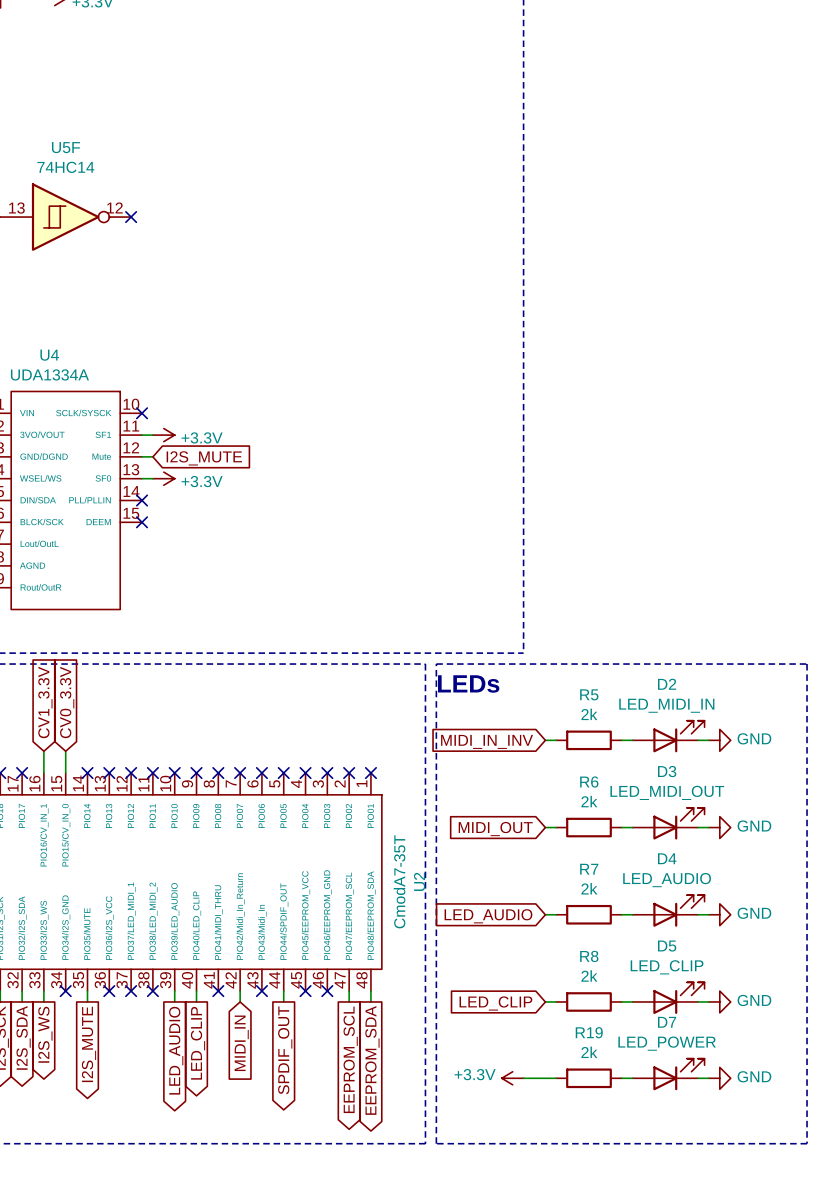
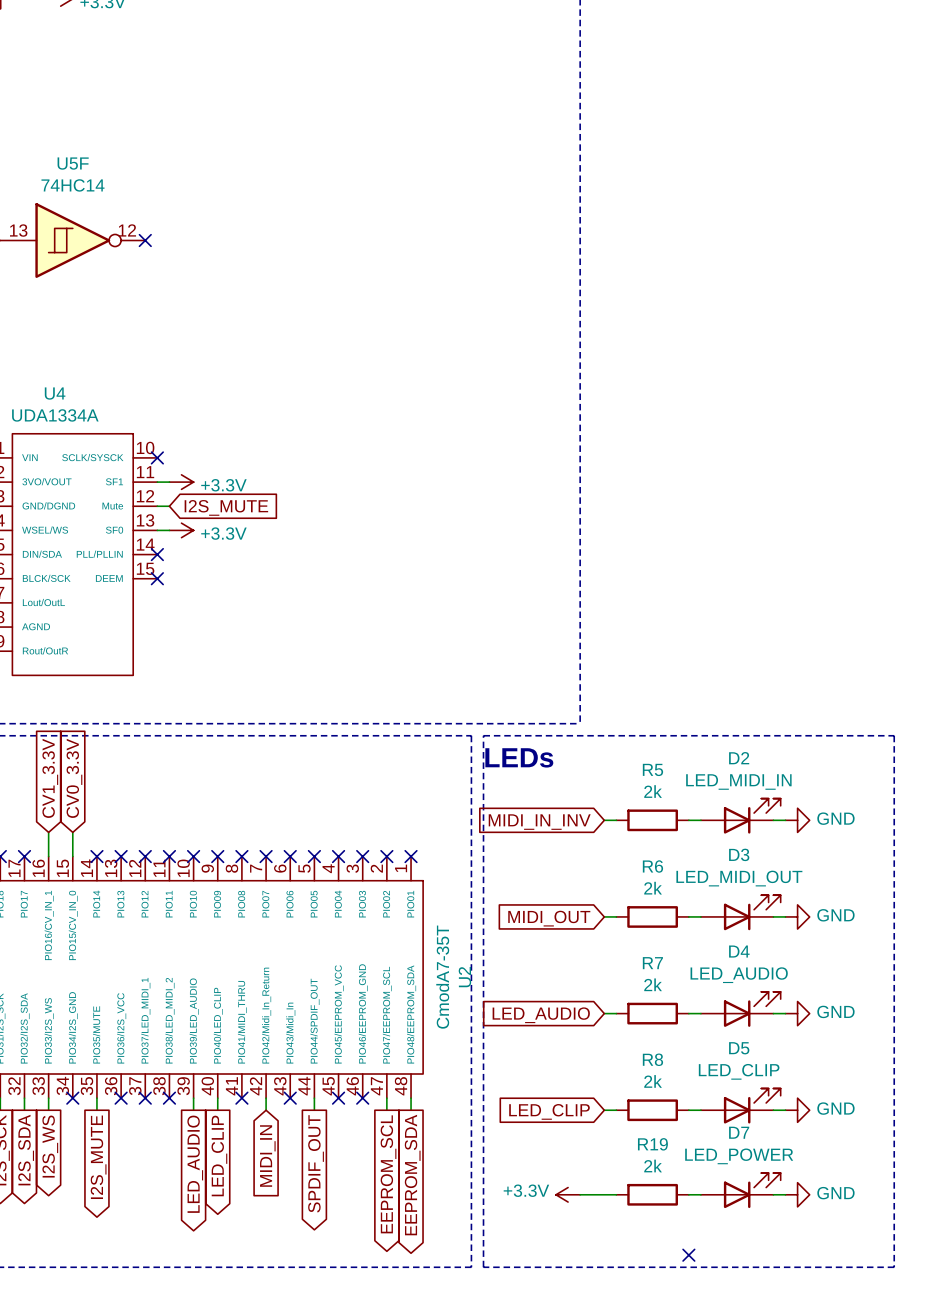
no-connect mark: none -> (688, 1255)

